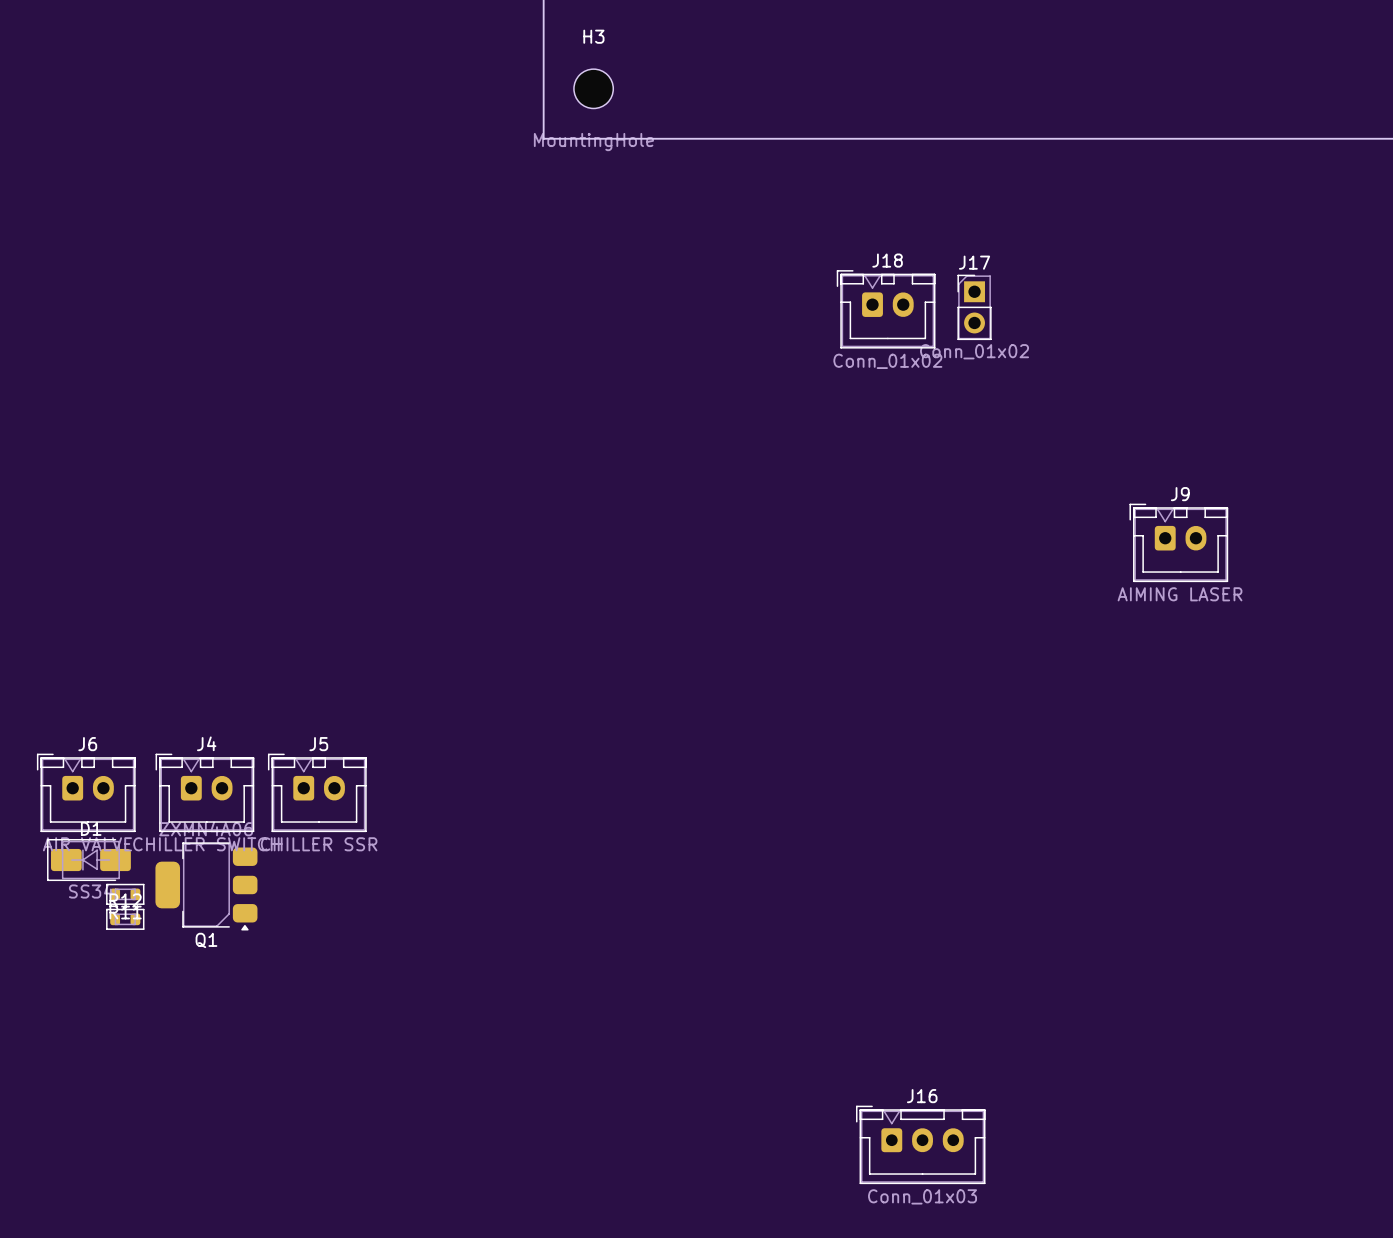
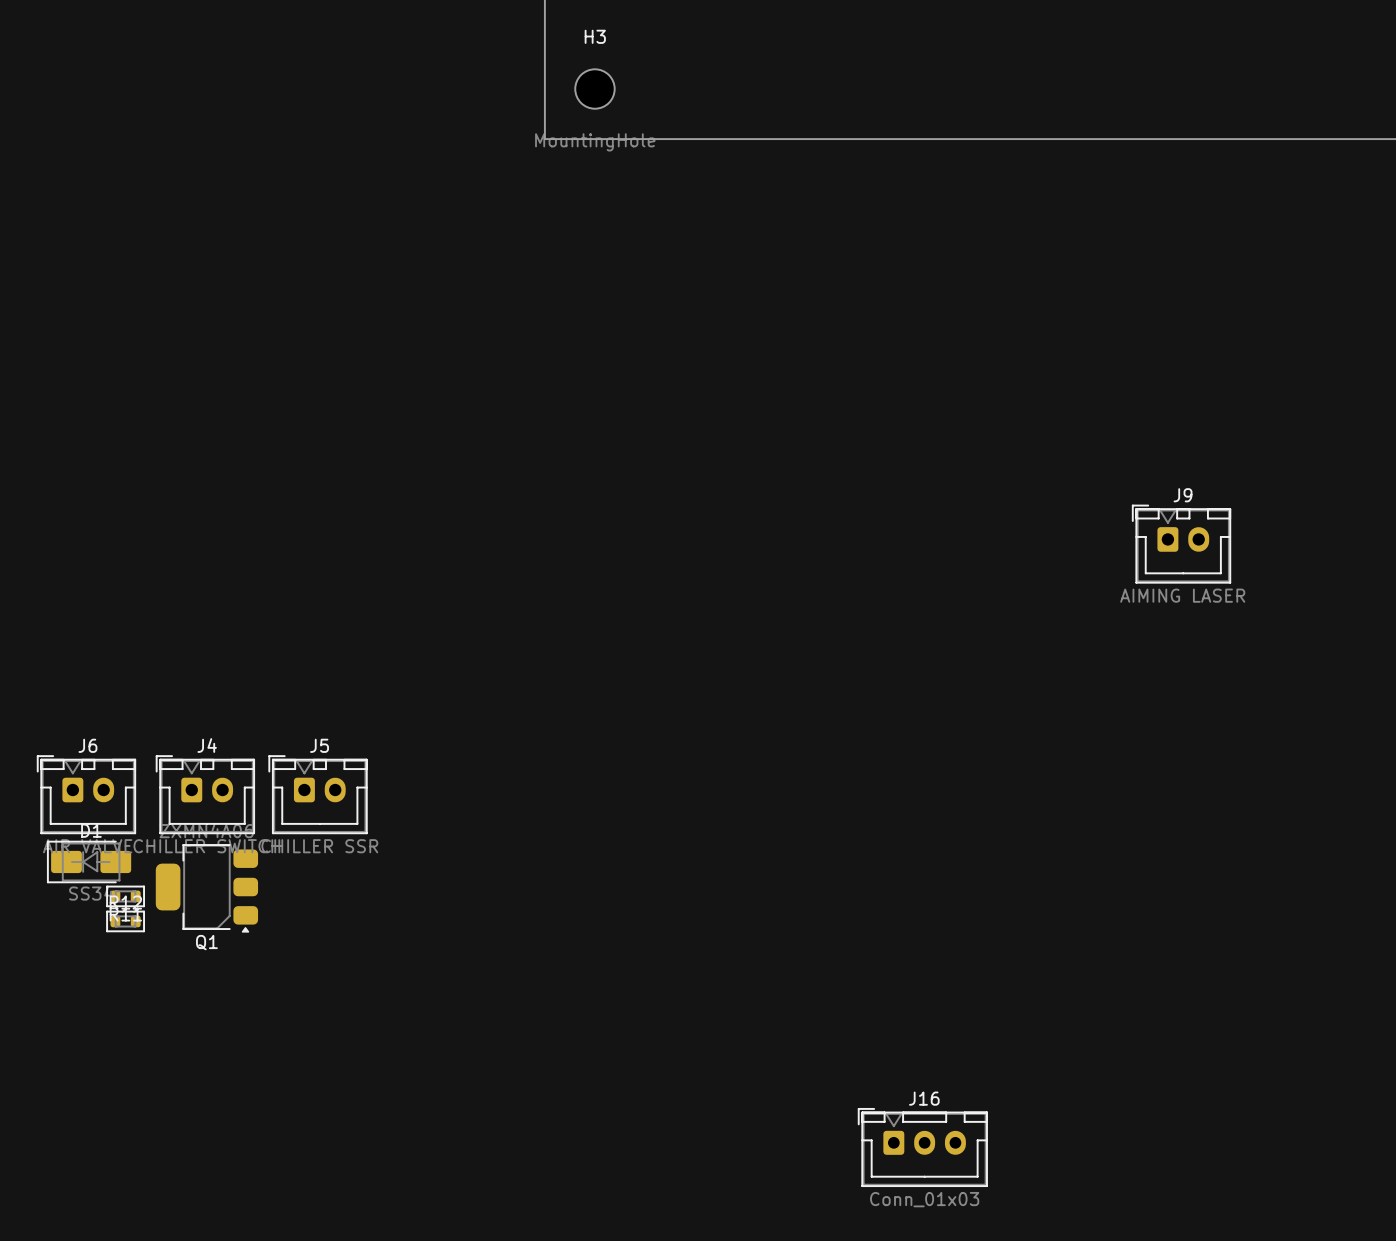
J17: Conn_01x02 (974, 307) -> none
J18: Conn_01x02 (886, 309) -> none

